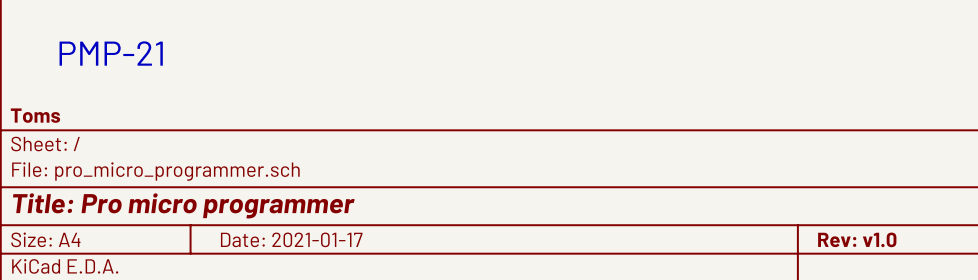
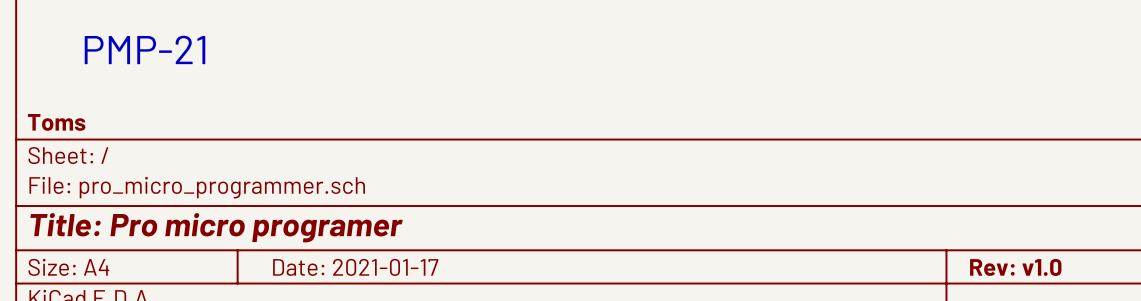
title block: Title: Pro micro programmer (183, 205) -> Title: Pro micro programer (216, 227)

